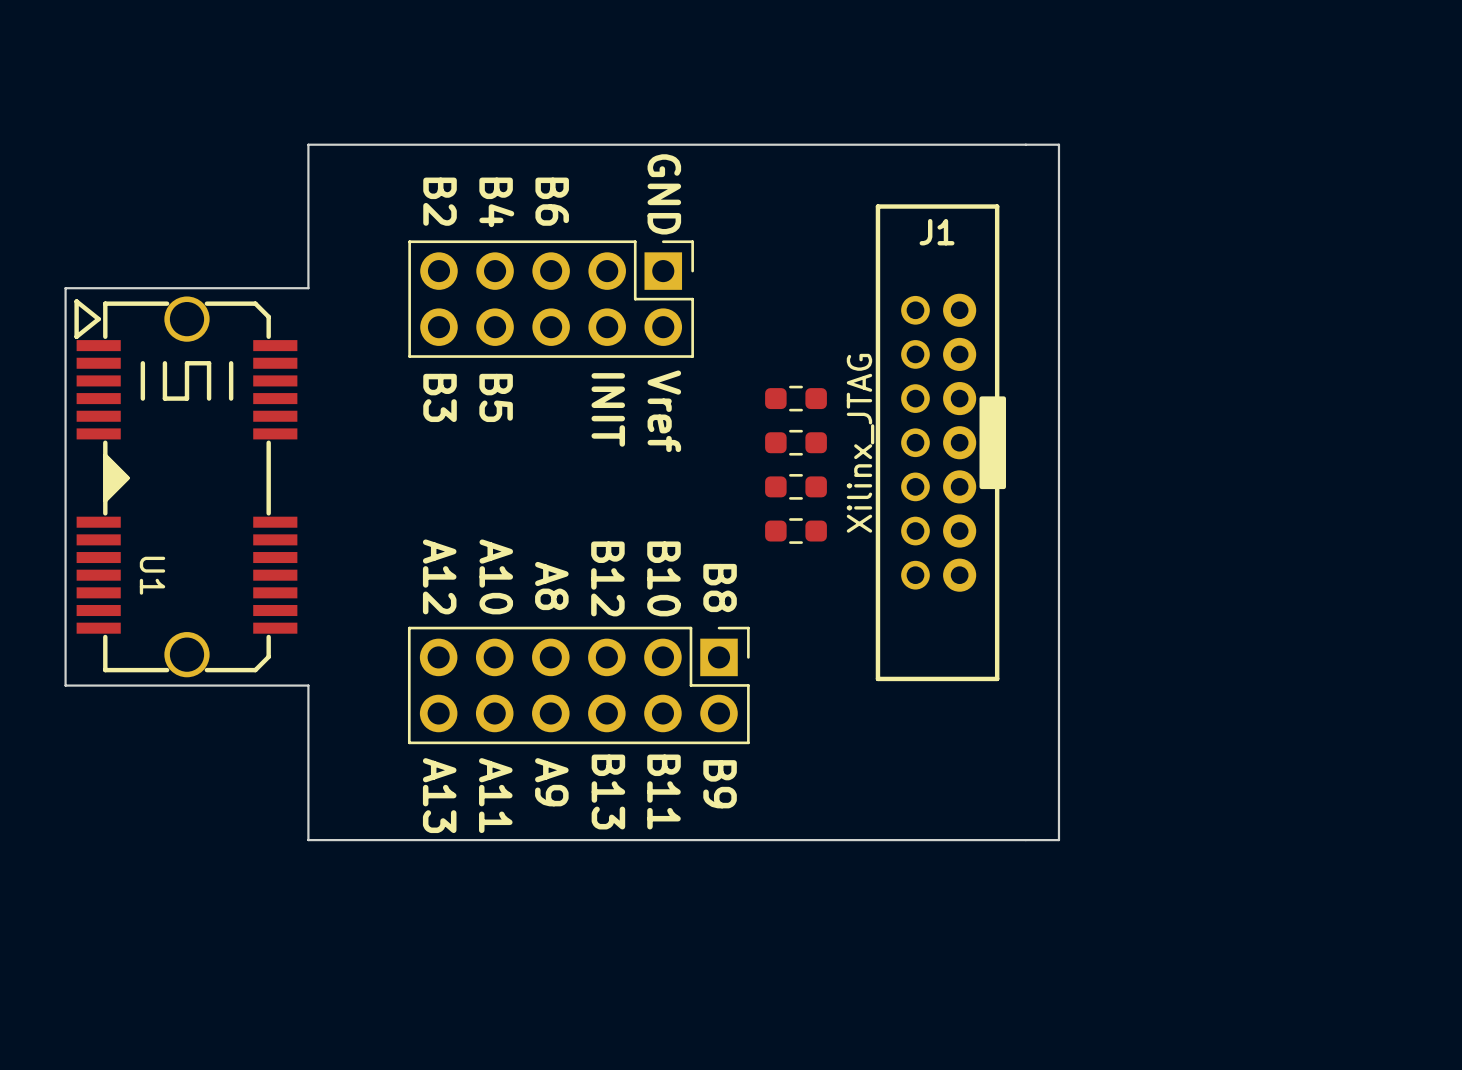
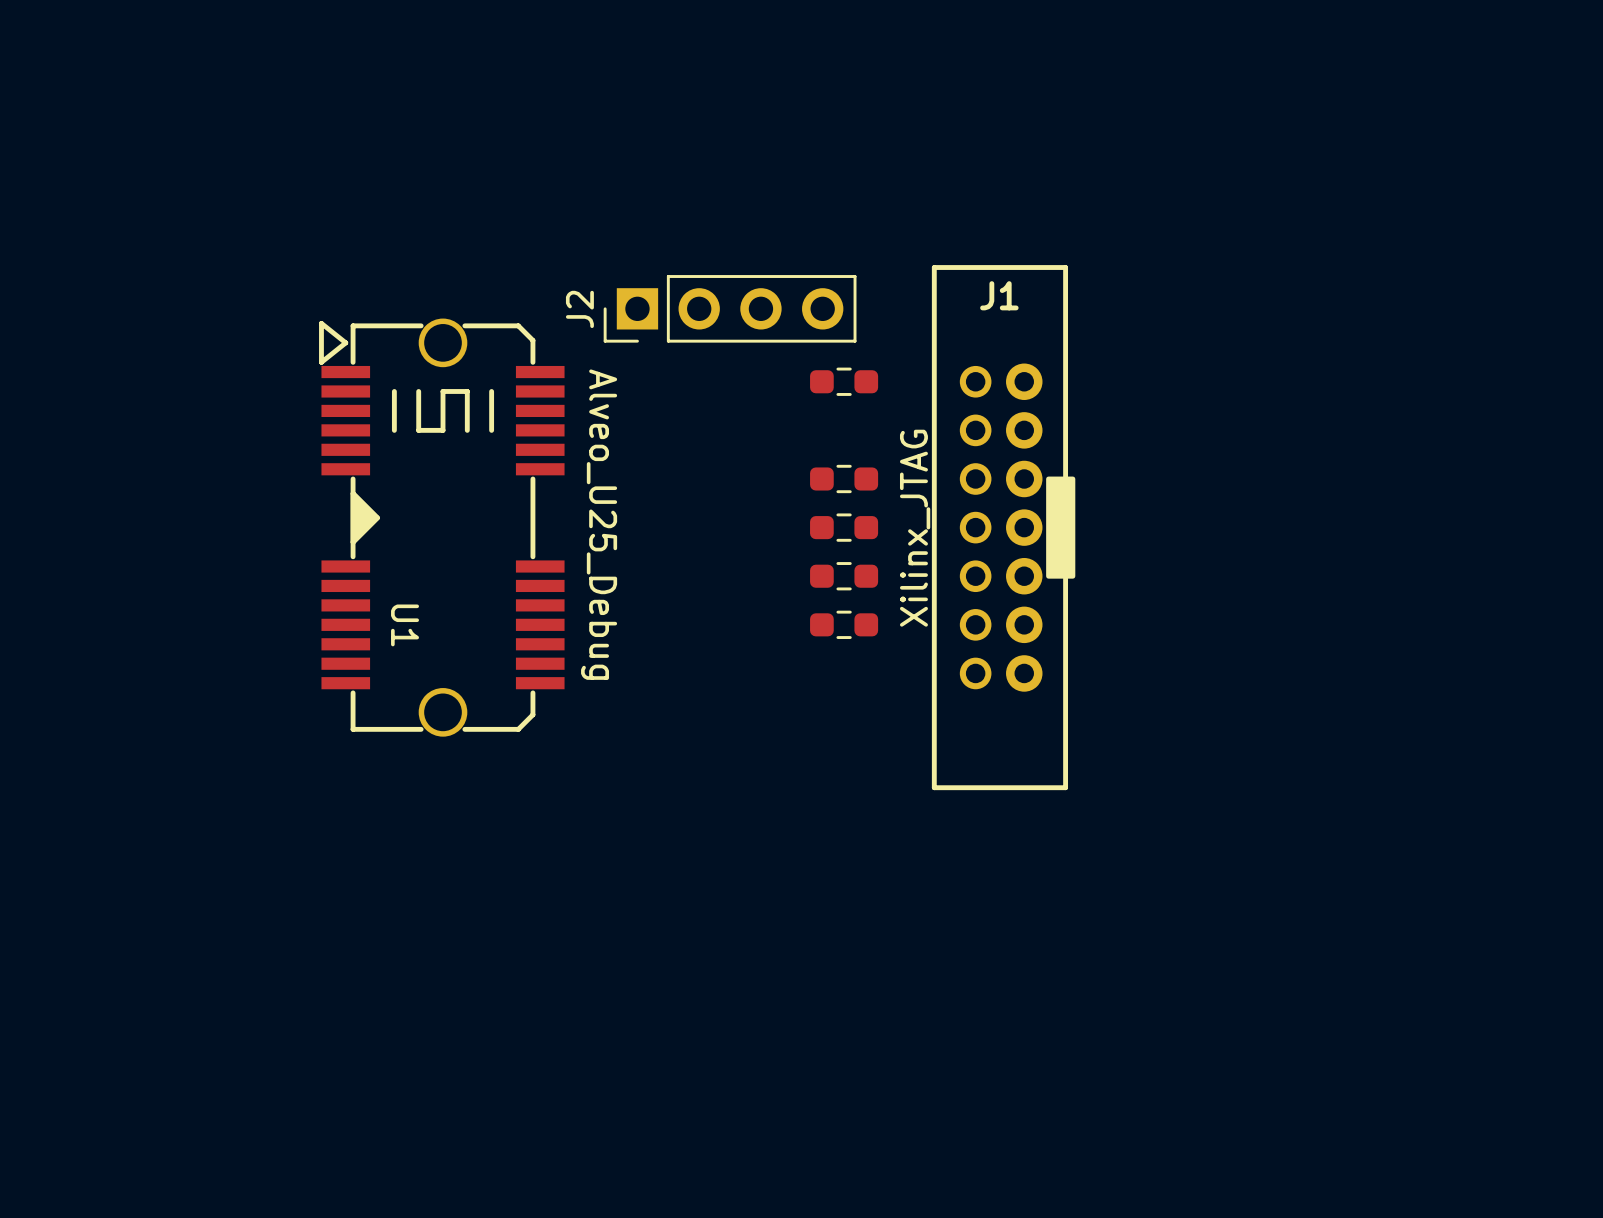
board edge: (308, 144) (1058, 144) (1058, 840) (308, 840) (308, 685) (65, 685) (65, 288) (308, 288) (308, 144) -> none
J2: none -> (730, 308)
U1 footprint: [74, 296, 298, 678] -> [319, 318, 565, 737]
part: (551, 299) -> none
part: none -> (844, 381)
U1 value: none -> Alveo_U25_Debug (599, 524)
part: (578, 685) -> none

